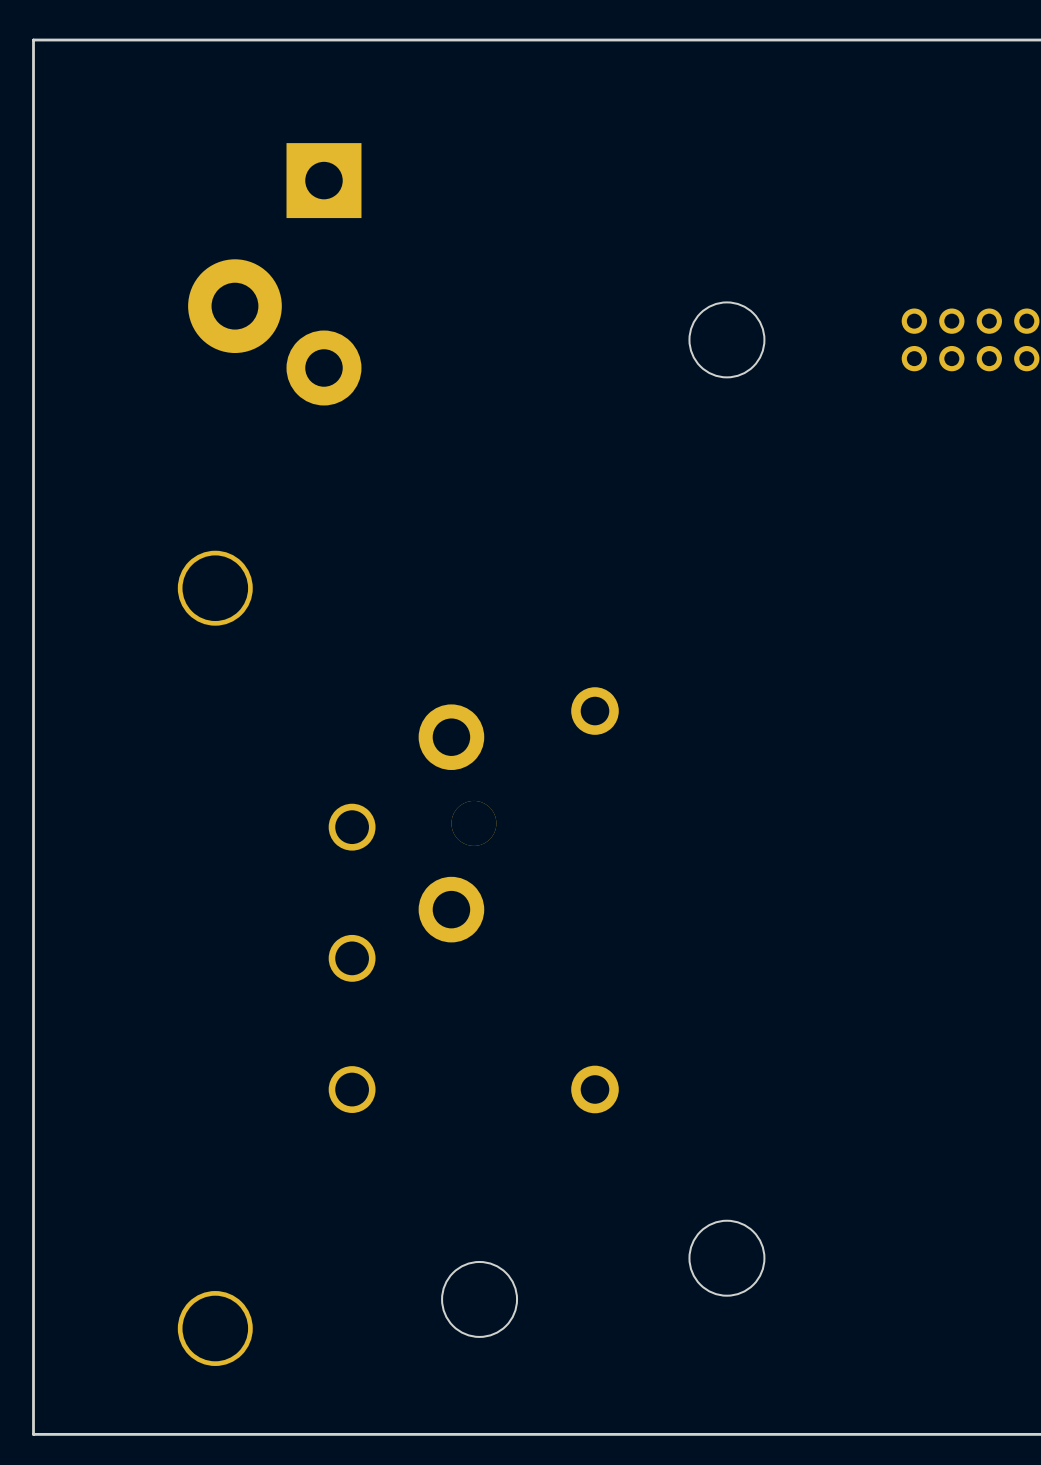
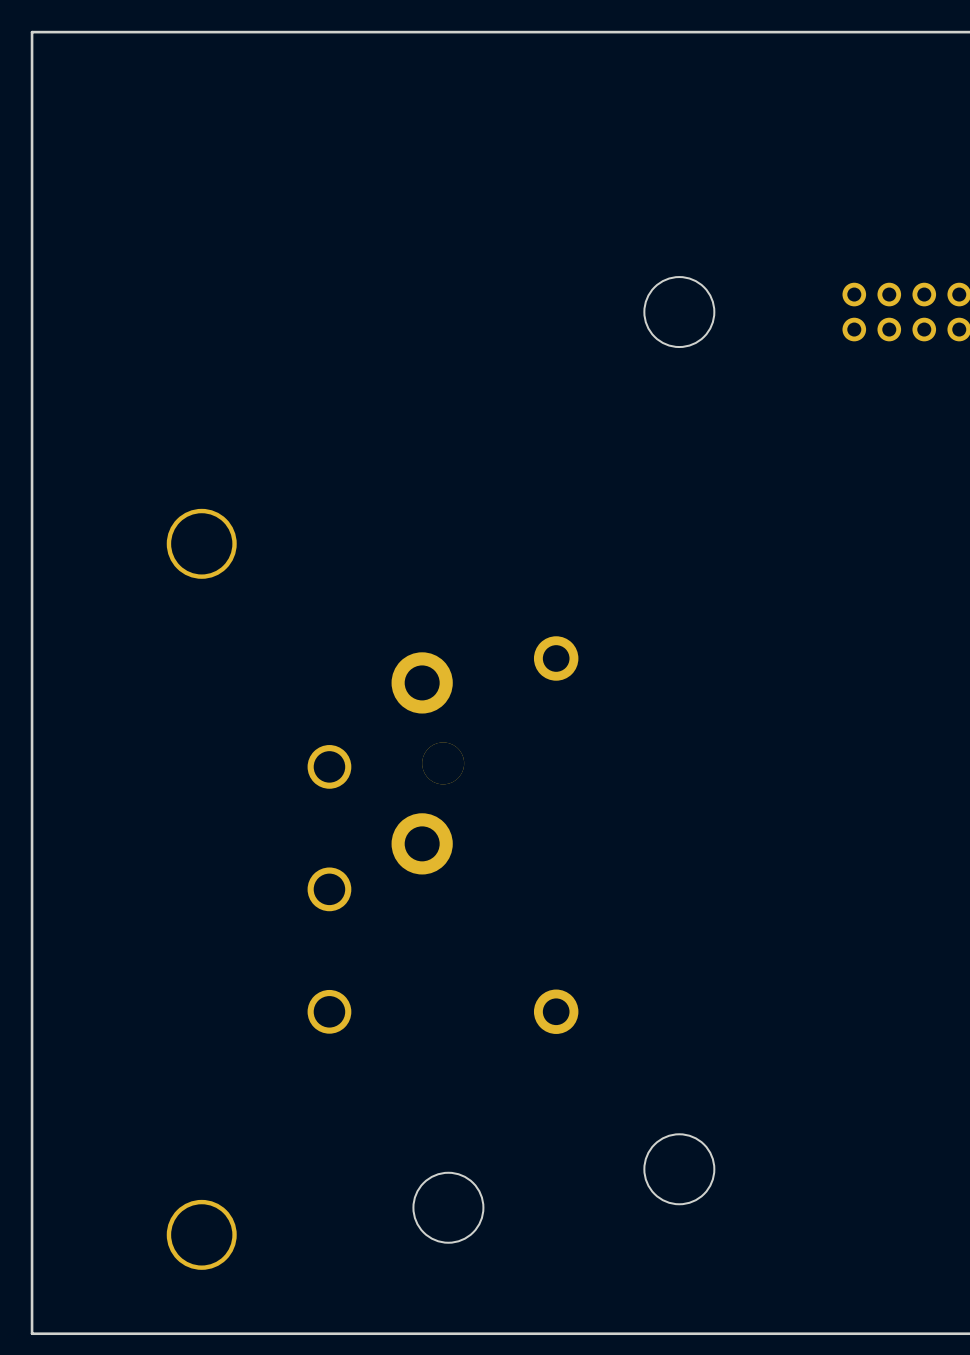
part: (274, 274) -> none

